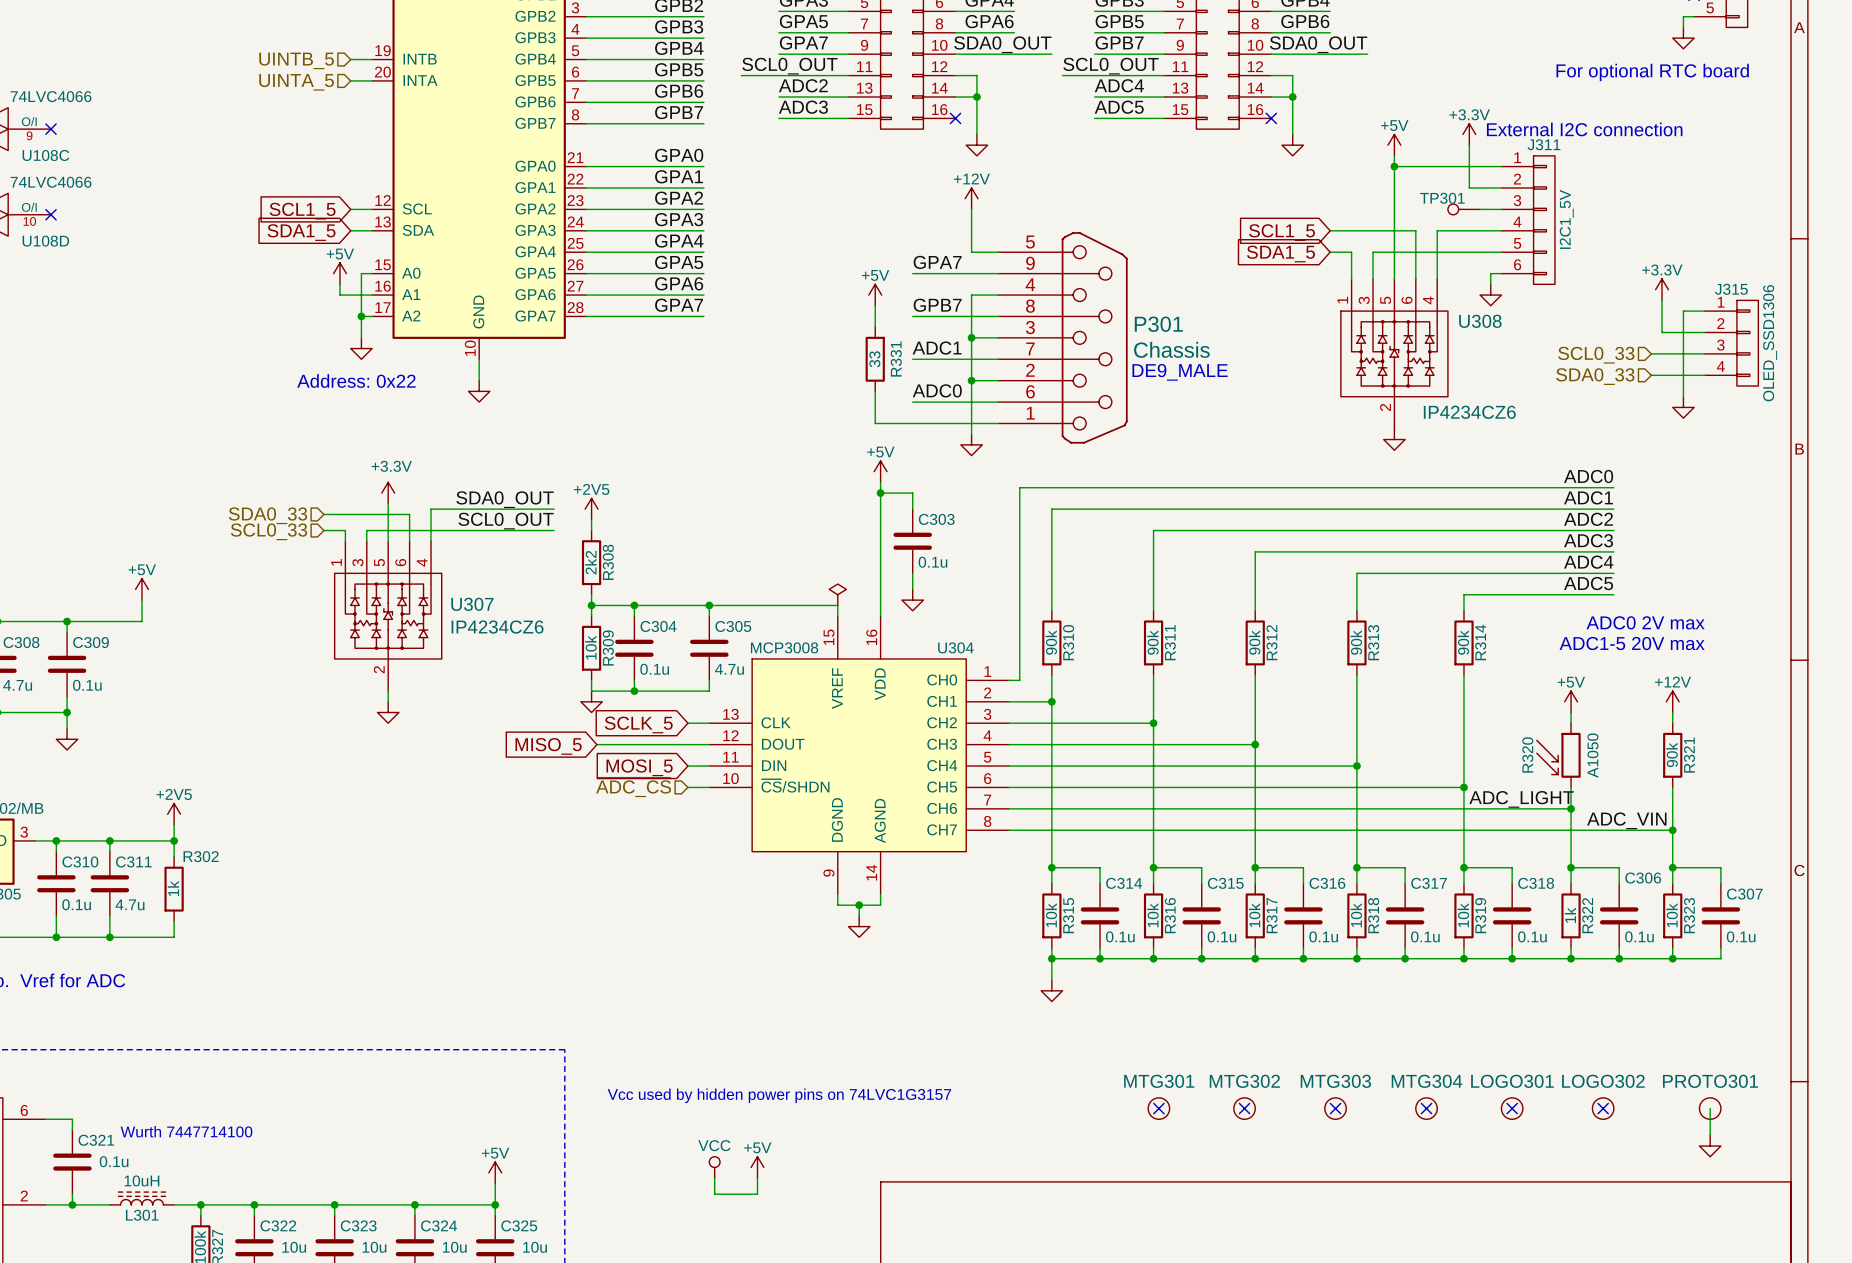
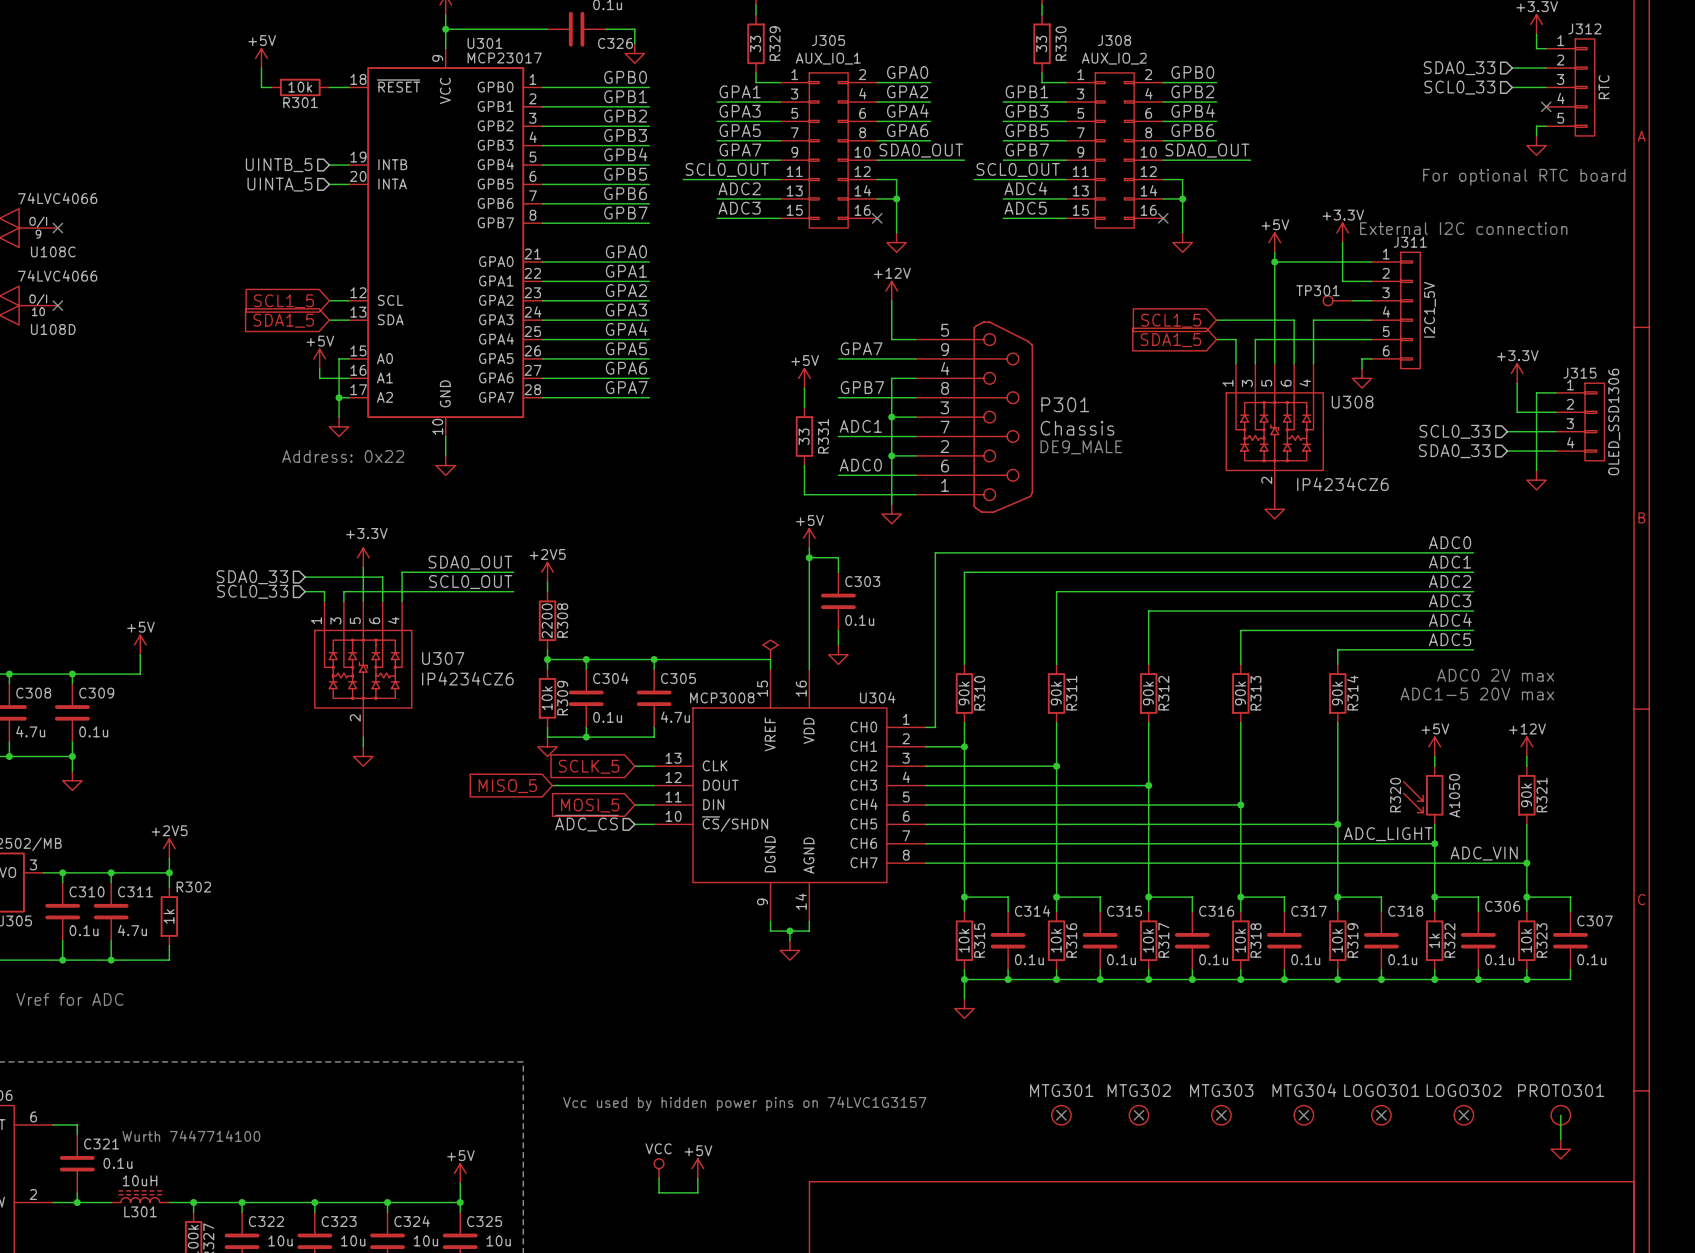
R308 value: 2k2 (590, 562) -> 2200 (547, 620)

